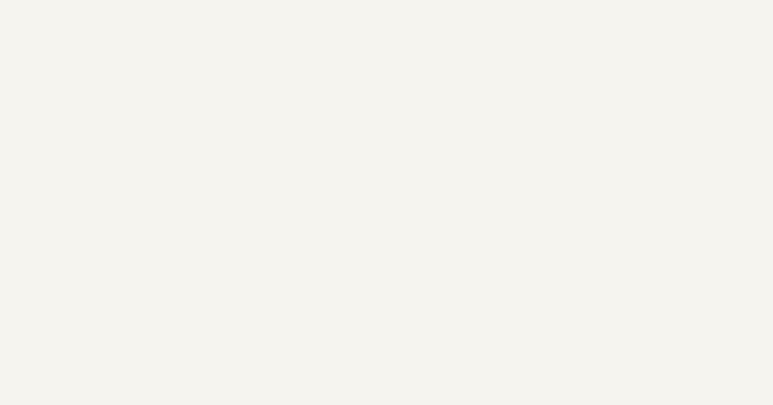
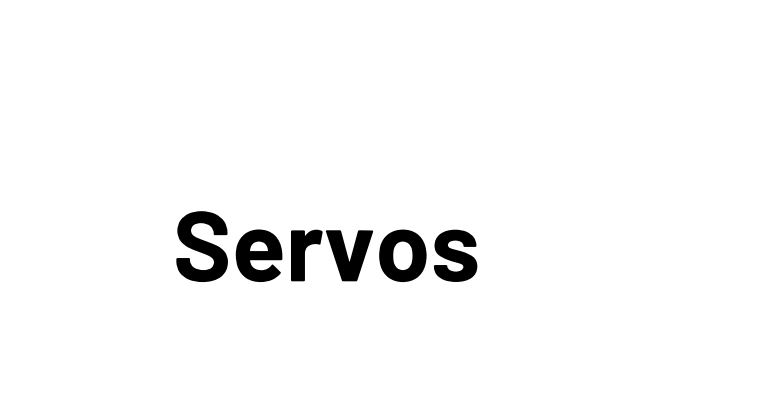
text: none -> Servos (326, 246)

